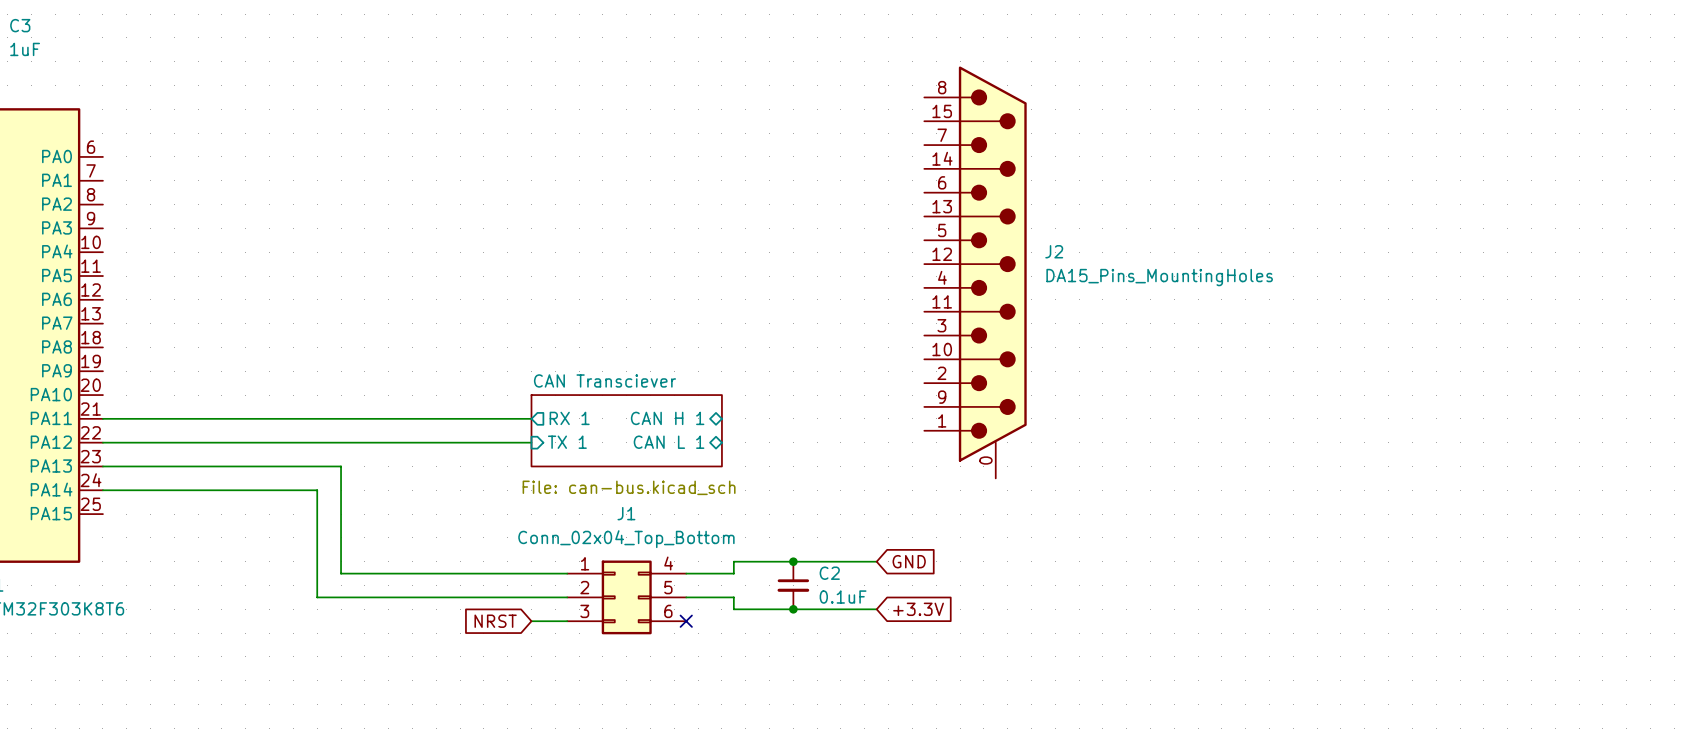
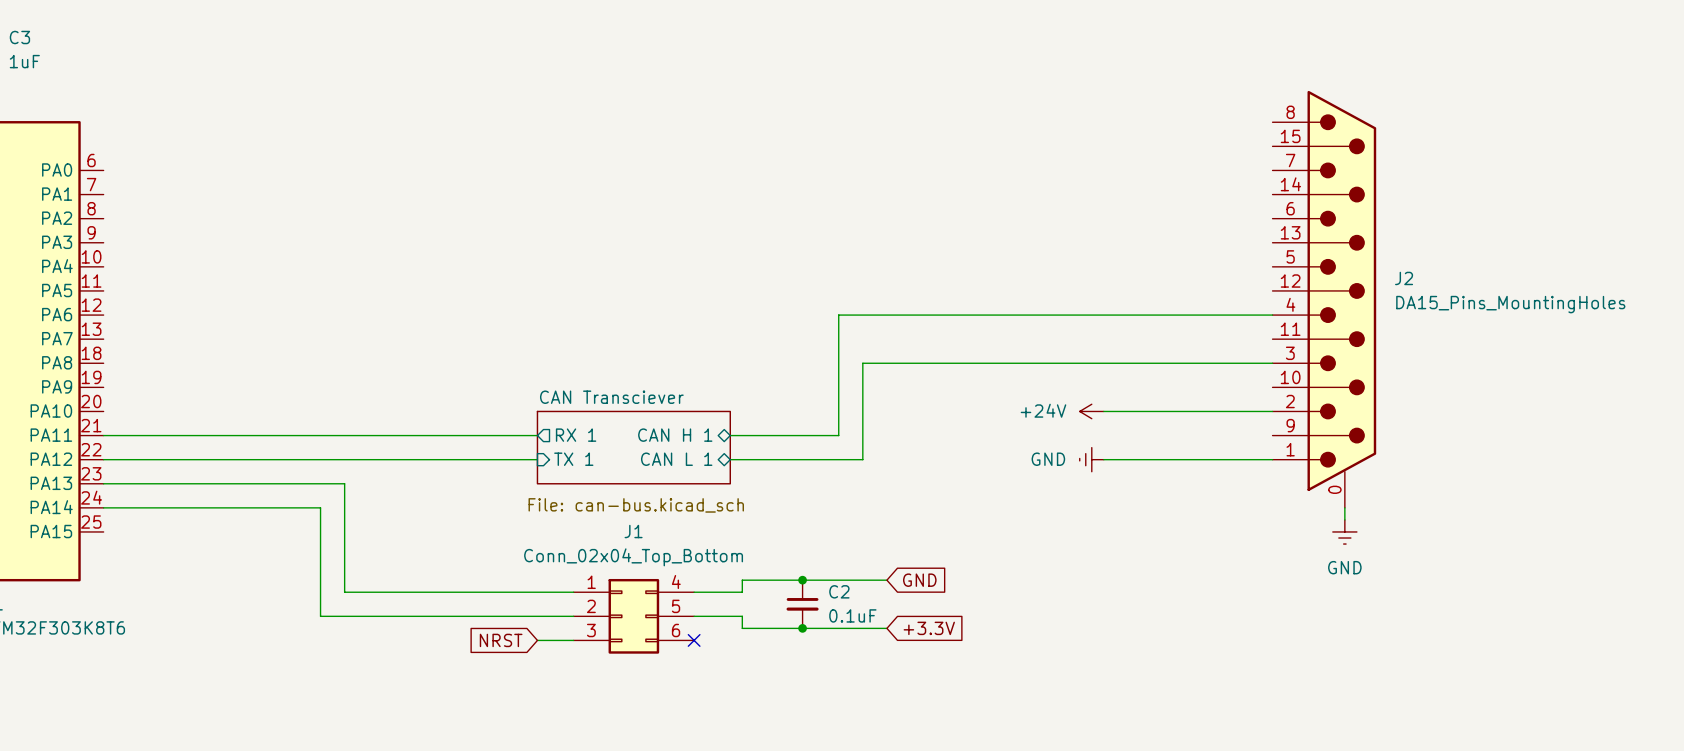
J2 position: (975, 272) -> (1324, 299)
wire: none -> (1272, 315) (838, 315) (838, 435) (730, 435)
wire: none -> (1272, 363) (862, 363) (862, 459) (730, 459)
power symbol: none -> +24V (1091, 411)
wire: none -> (1103, 411) (1272, 411)
power symbol: none -> GND (1091, 459)
wire: none -> (1103, 459) (1272, 459)
wire: none -> (1344, 507) (1344, 519)
power symbol: none -> GND (1344, 531)

